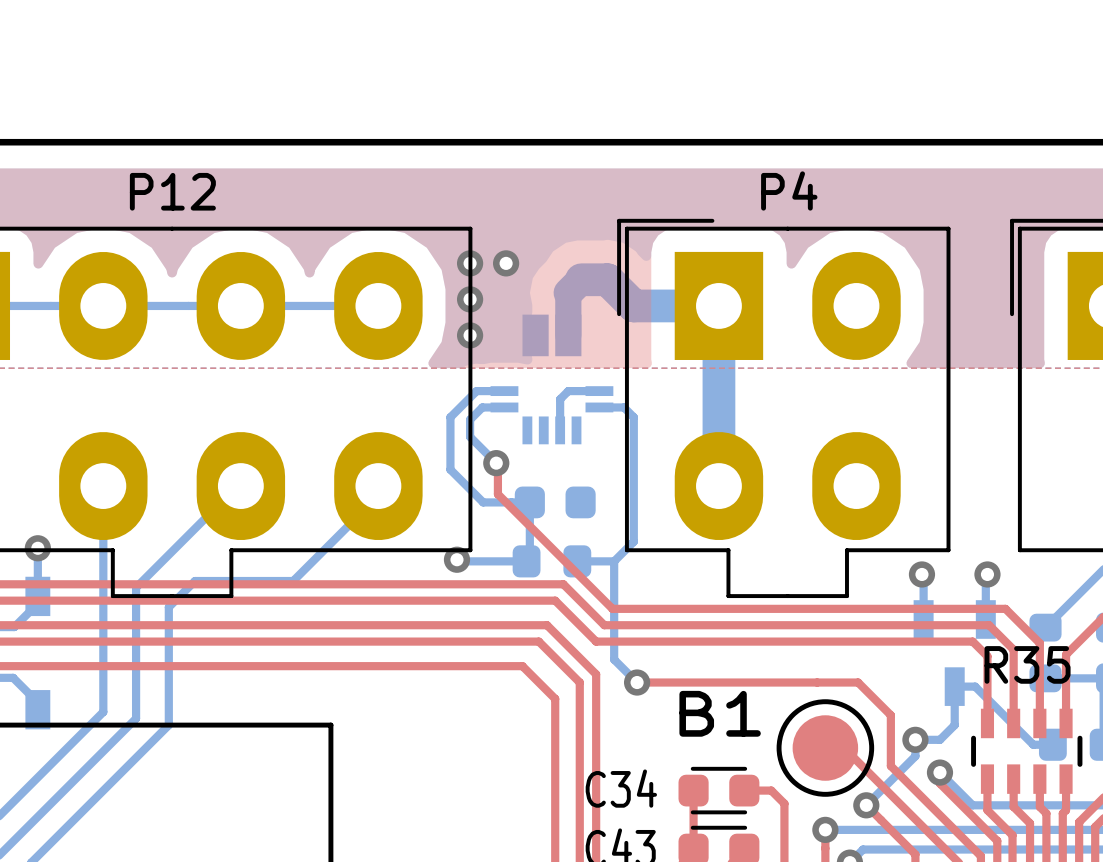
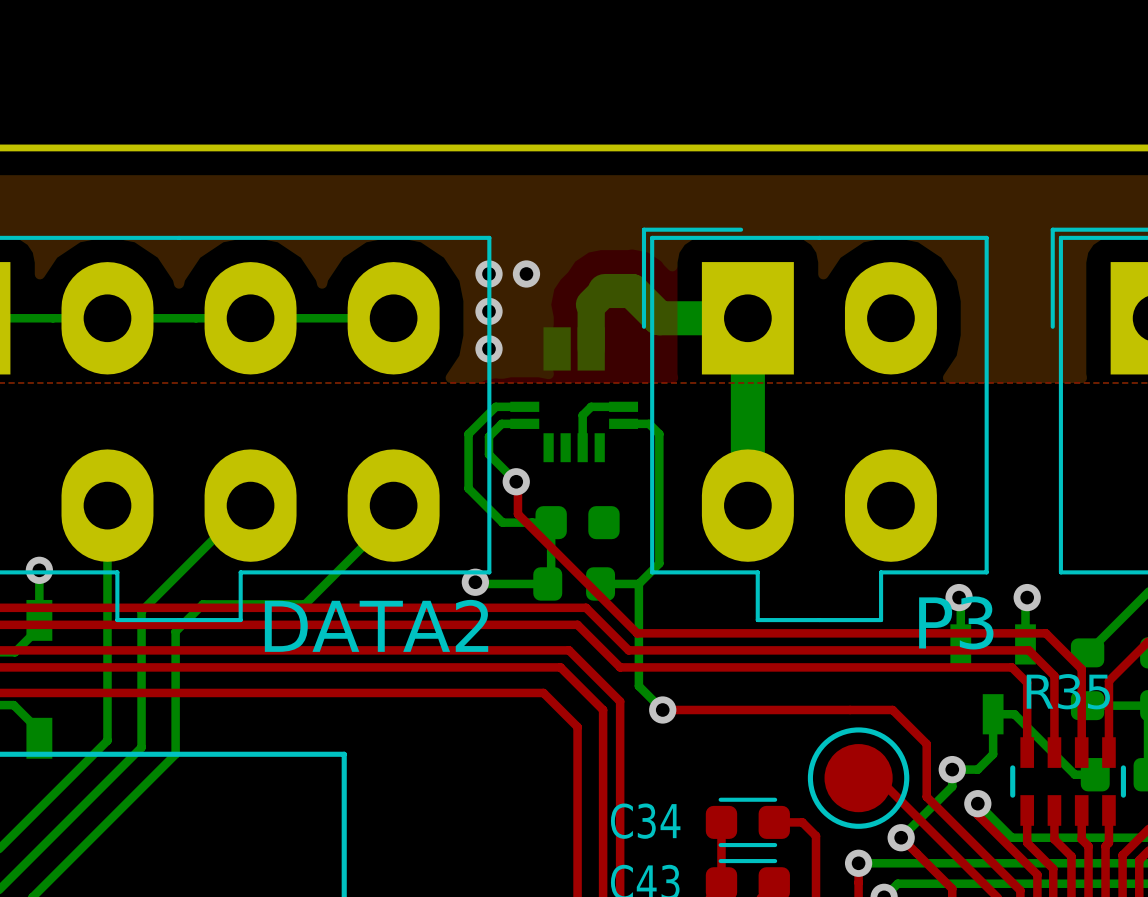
P4 name: P4 (789, 190) -> none
P12 name: P12 (172, 191) -> none
text: none -> P3 (956, 622)
text: none -> DATA2 (376, 625)
text: B1 (720, 713) -> none

